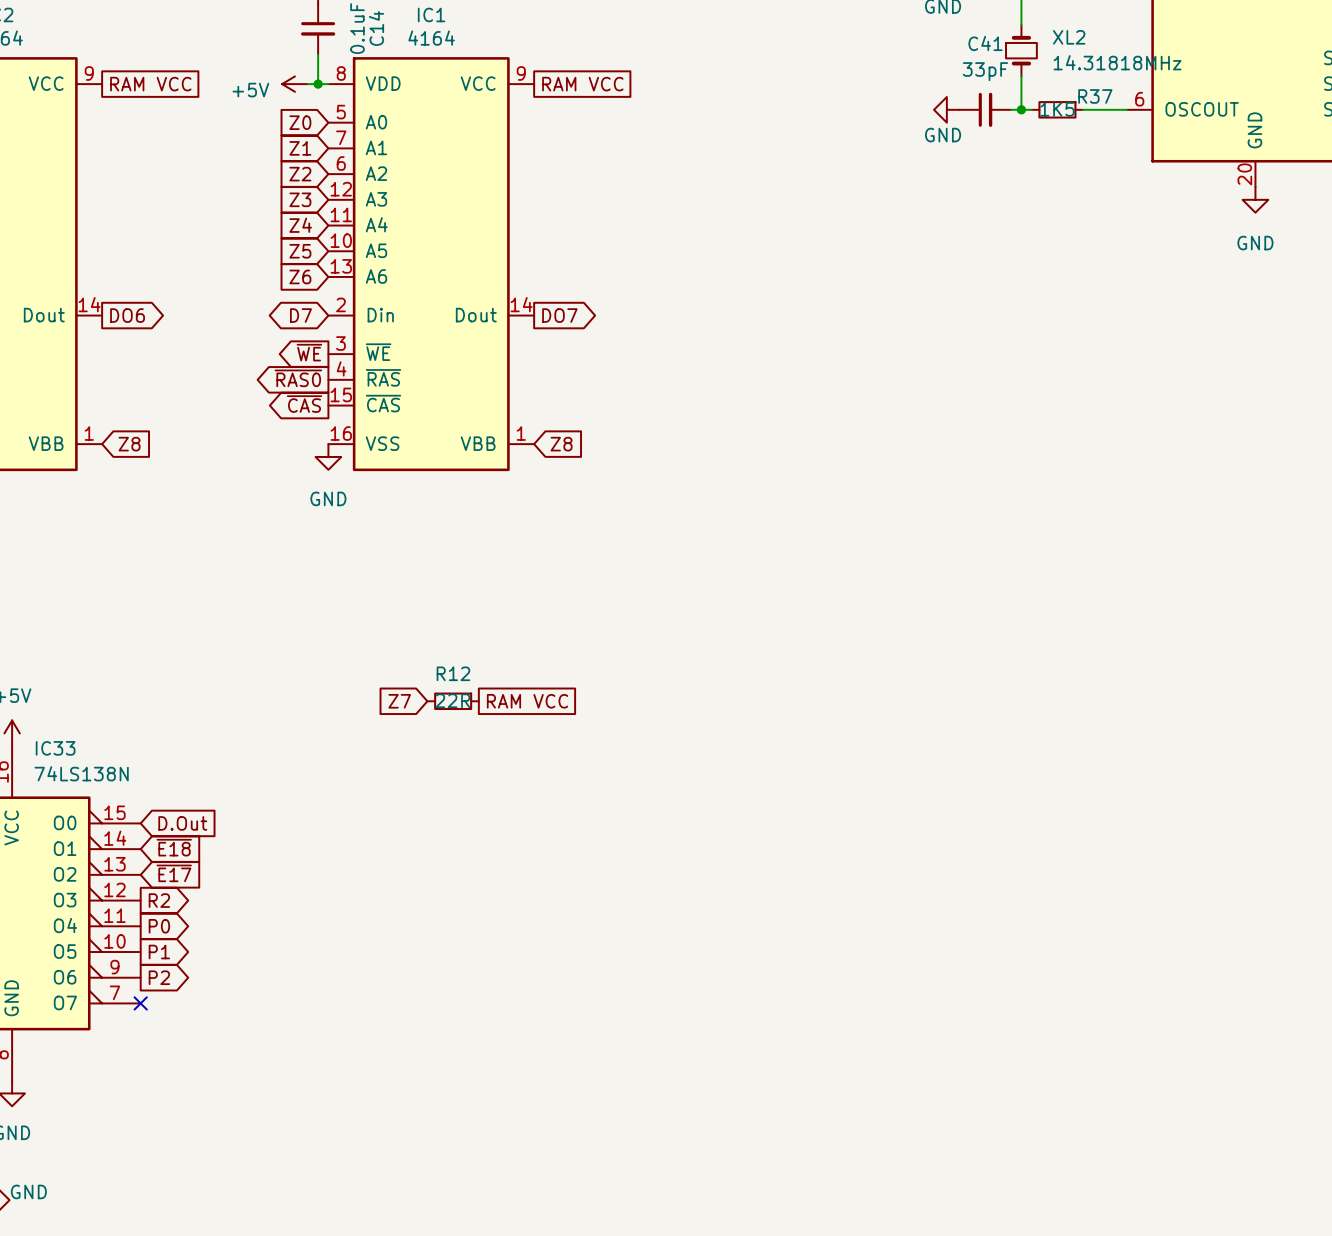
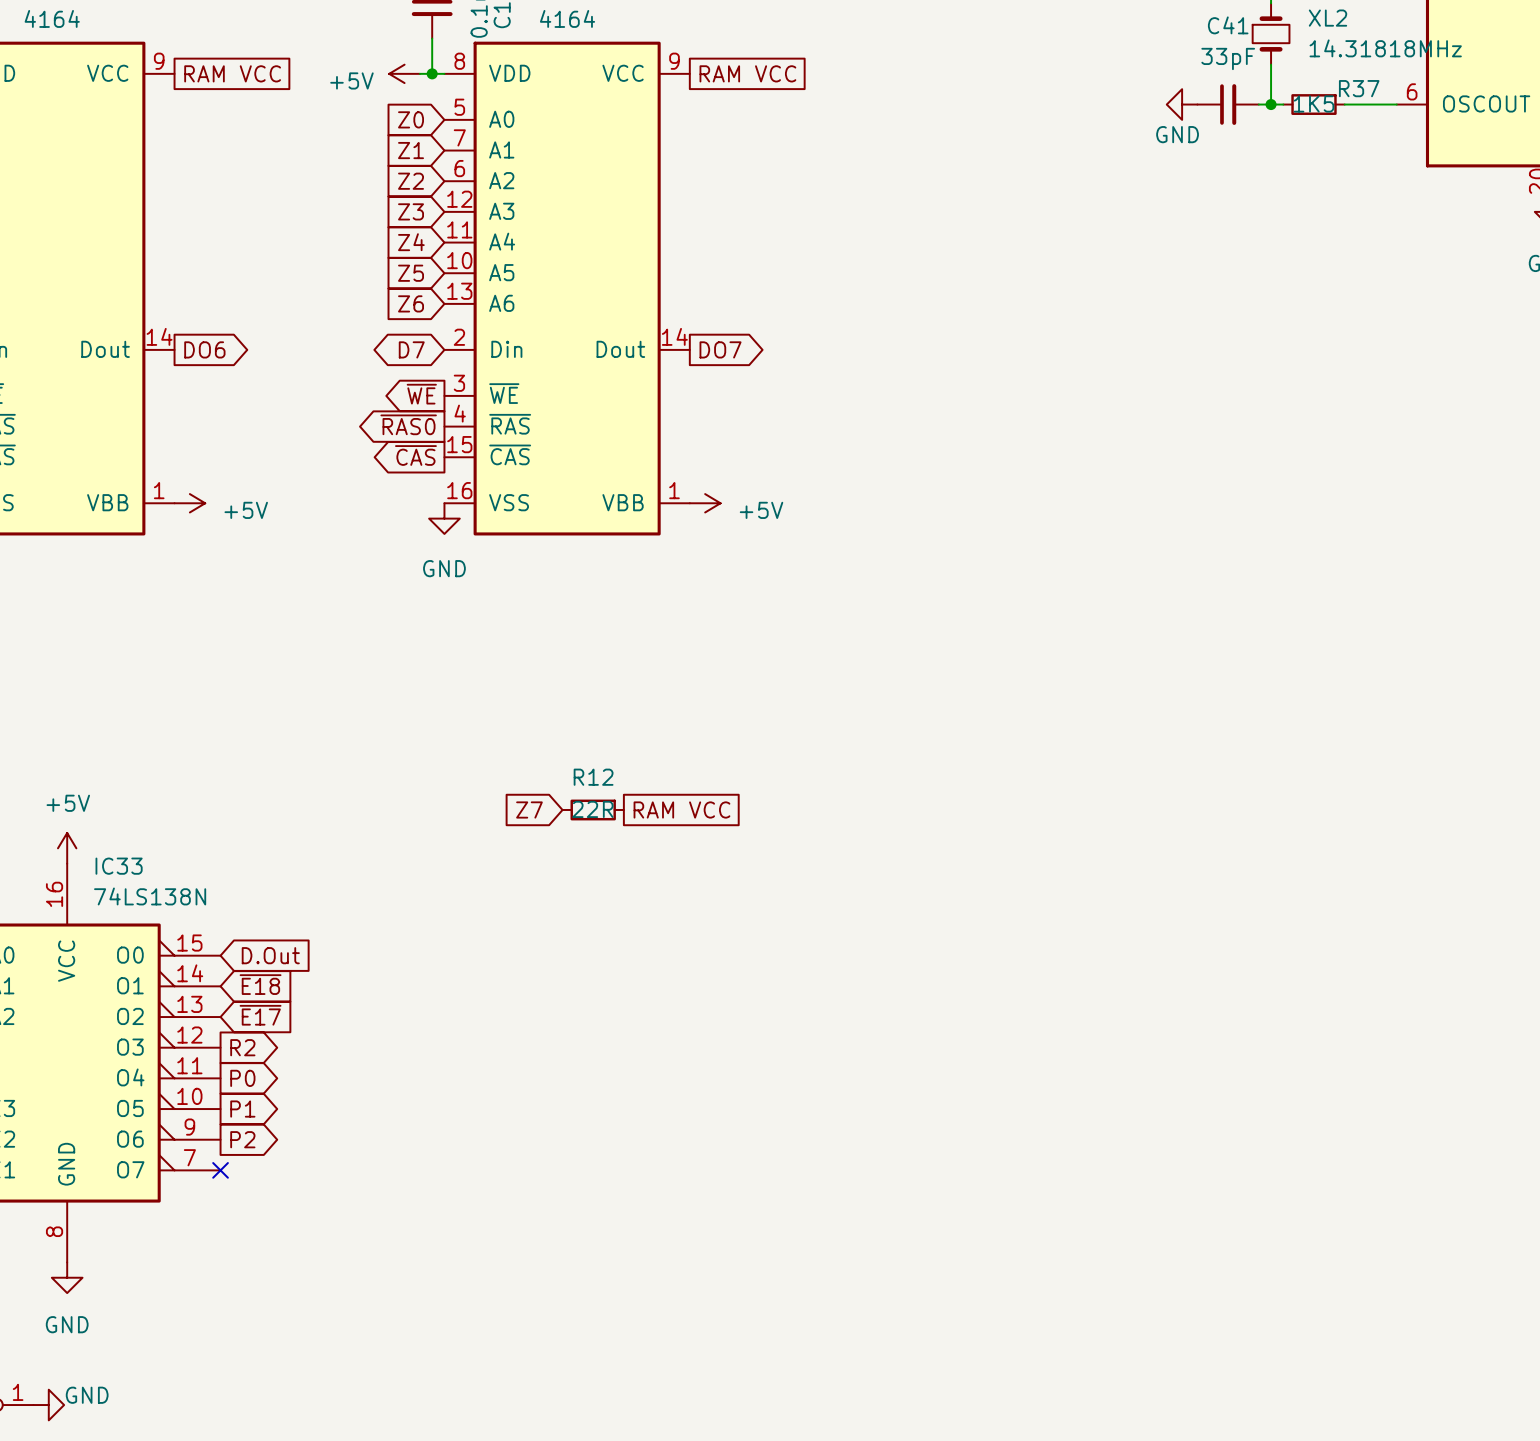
power symbol: none -> +5V (189, 503)
global label: Z8 (129, 444) -> none
power symbol: none -> +5V (705, 503)
global label: Z8 (561, 444) -> none

